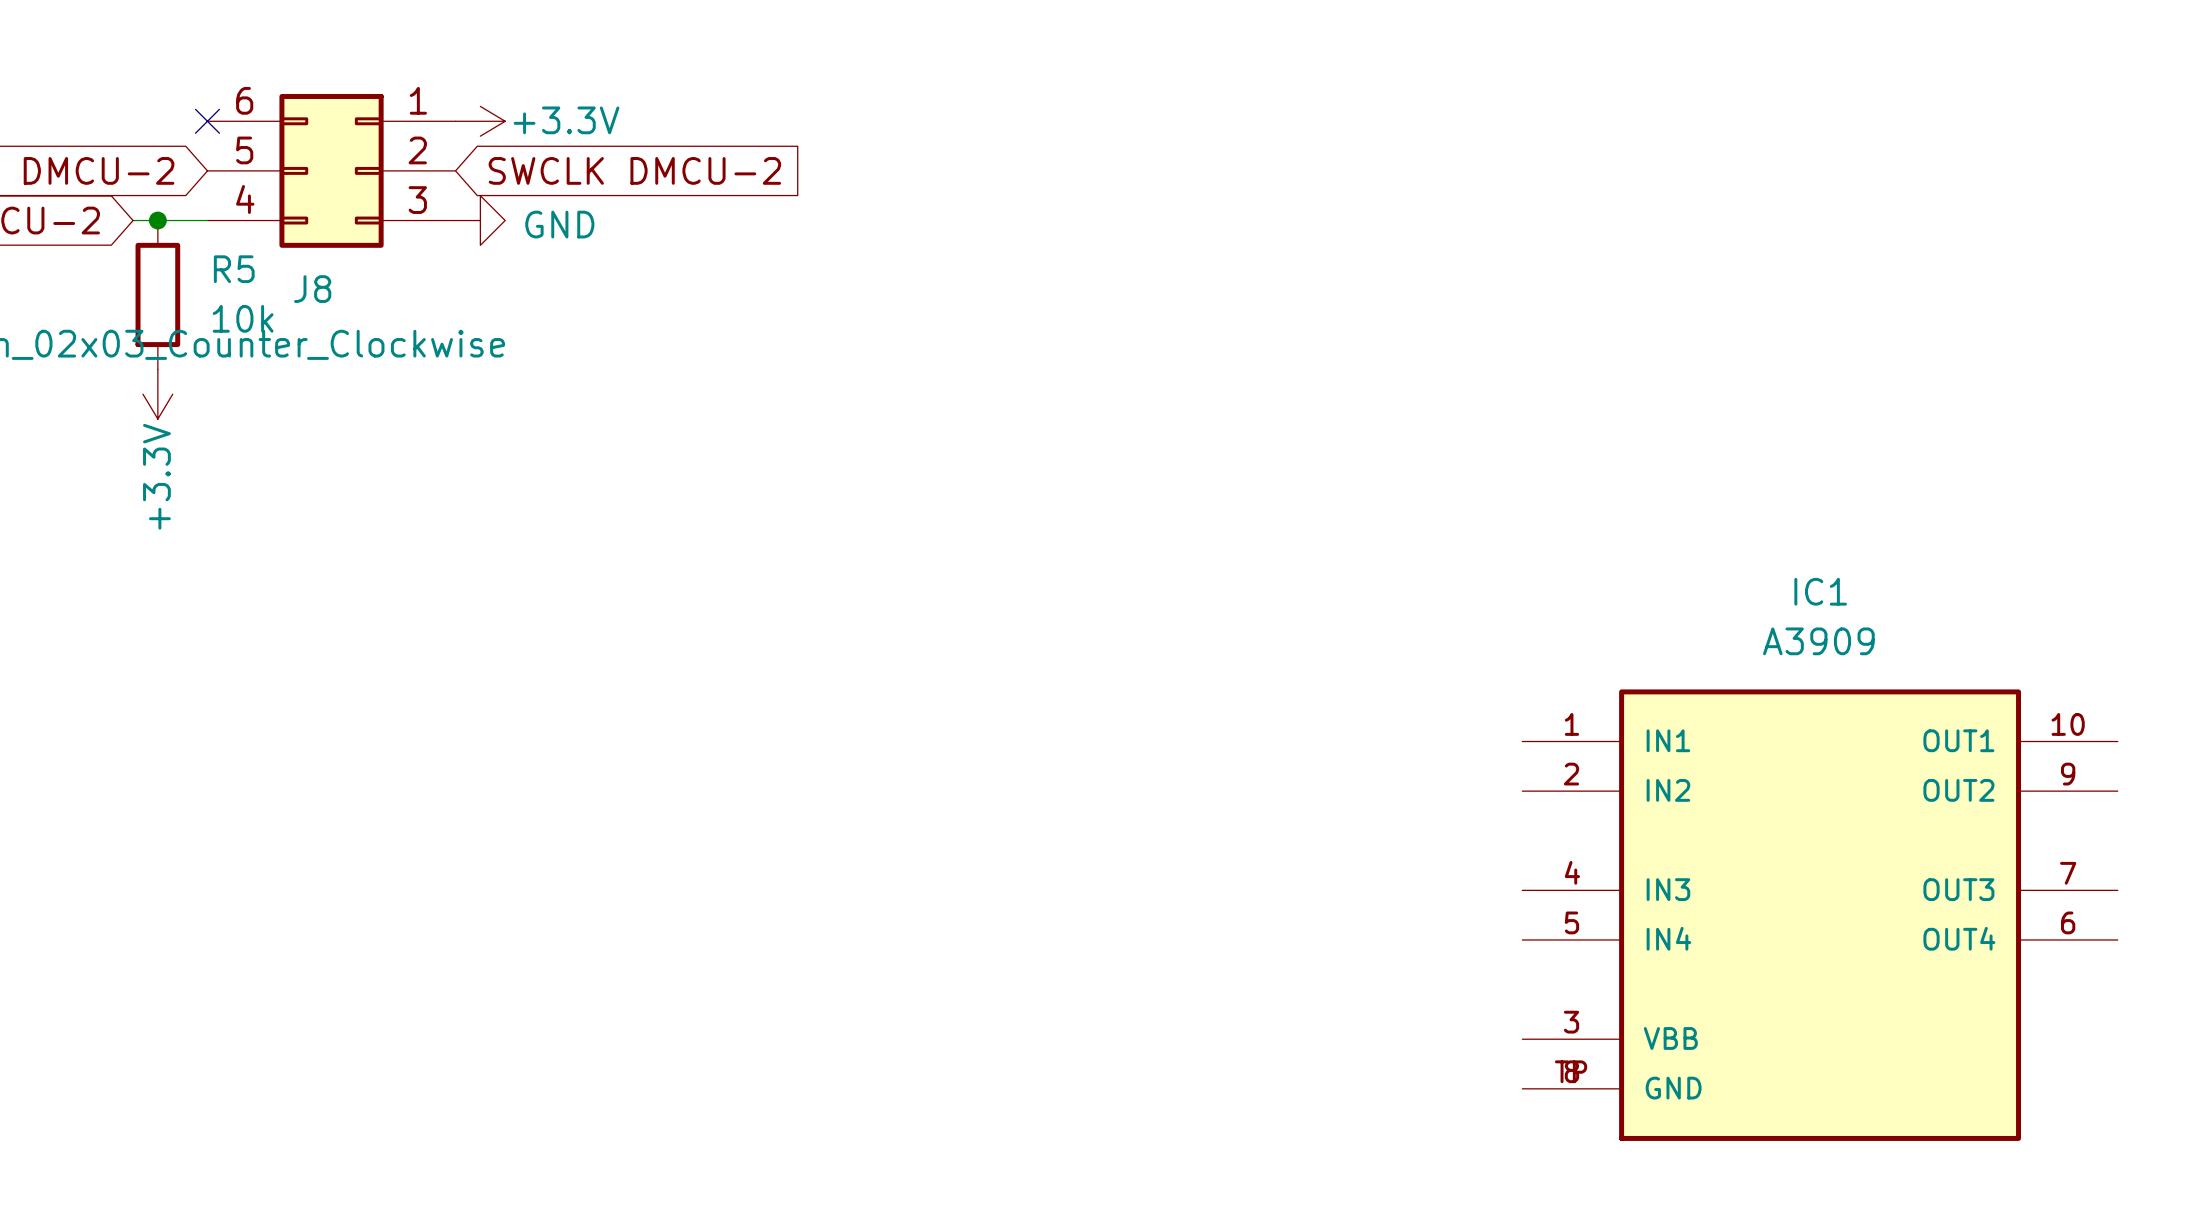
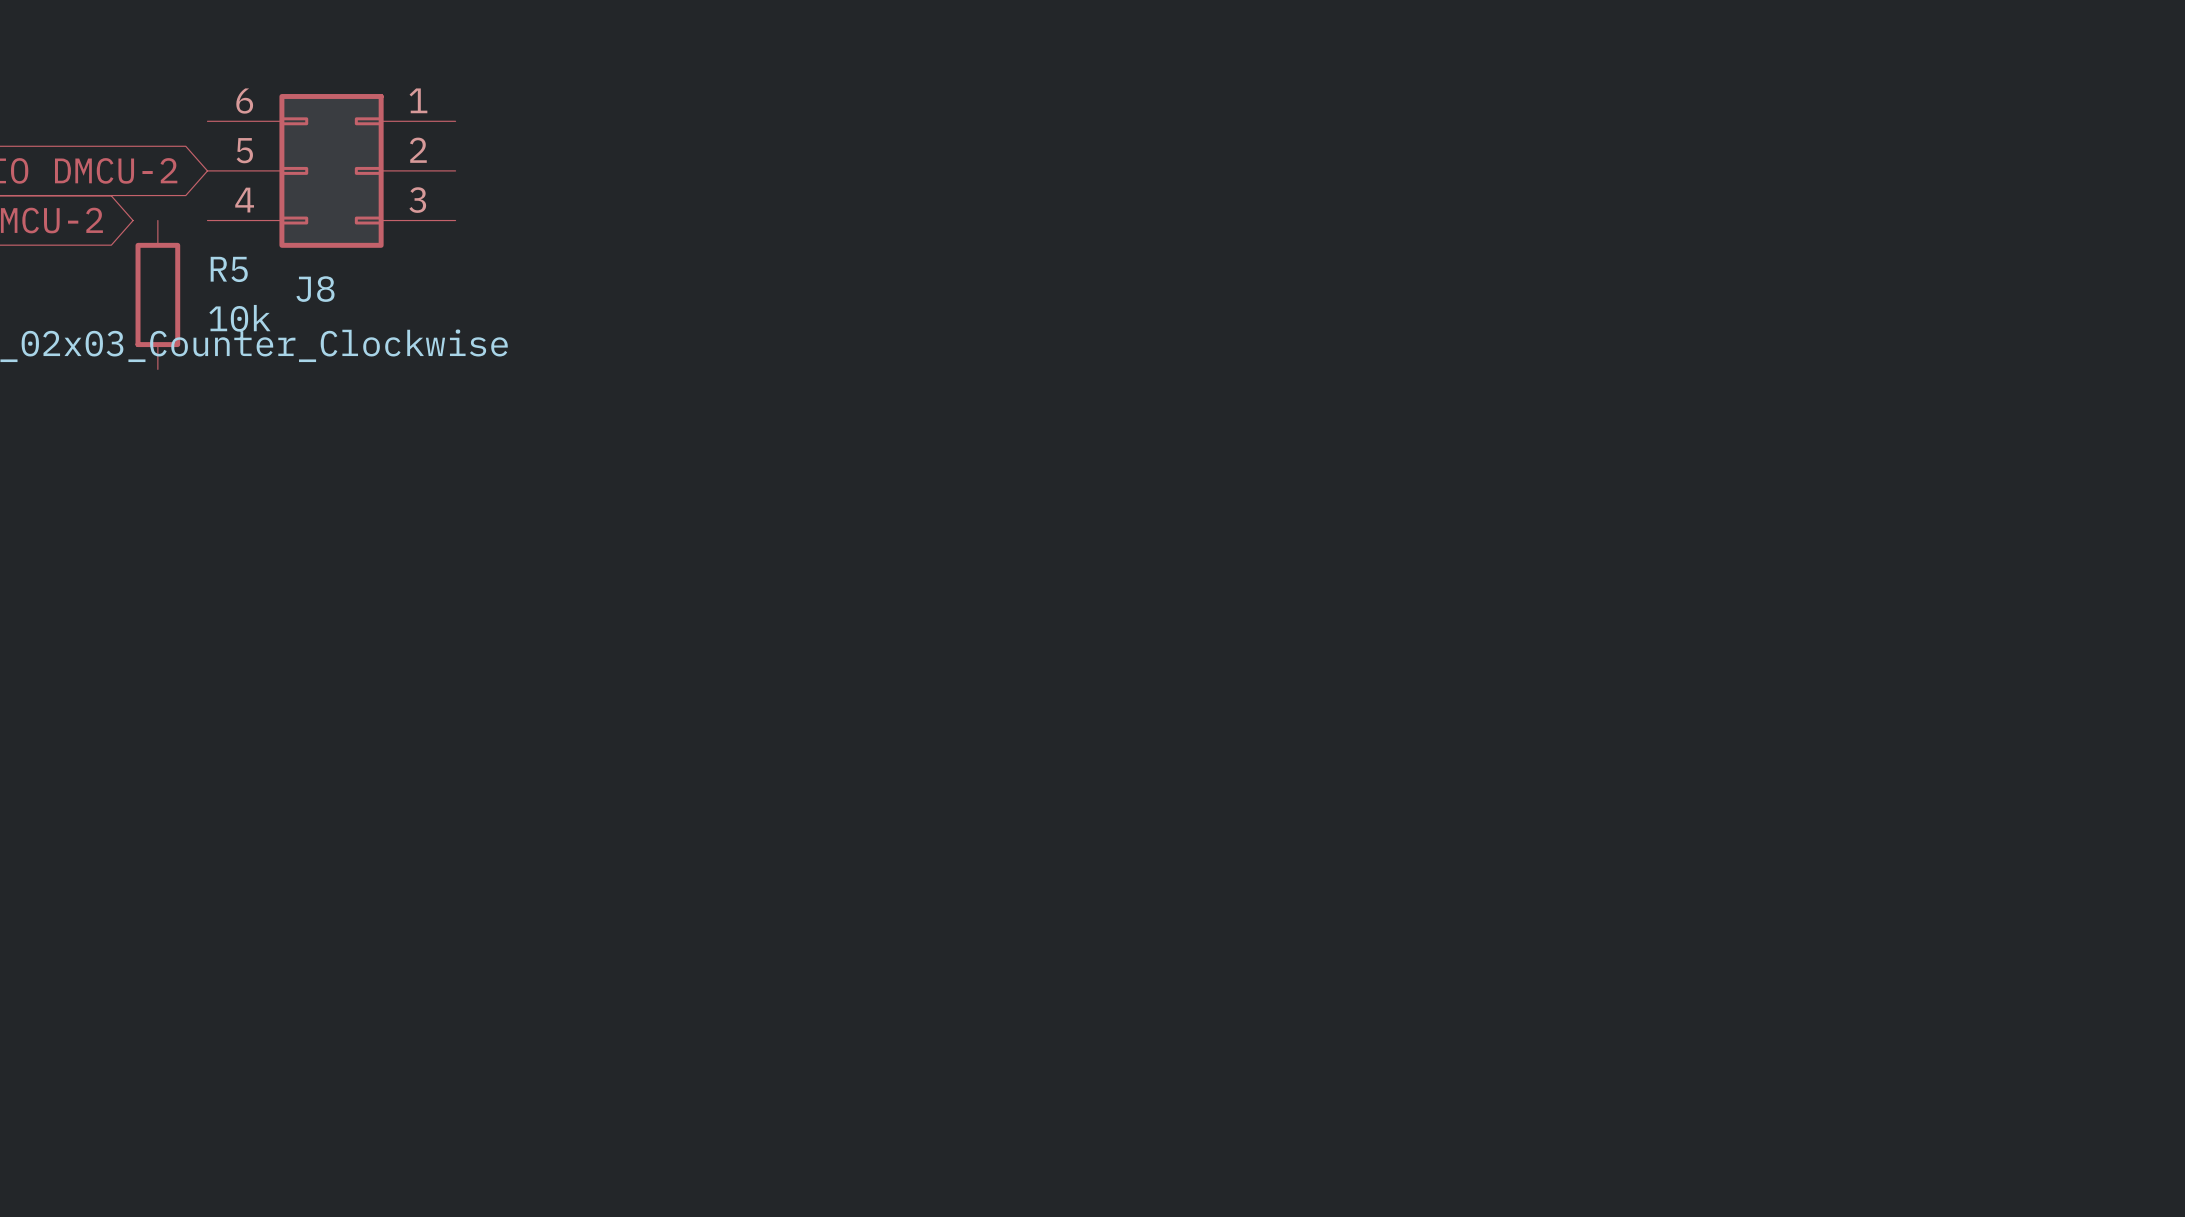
no-connect mark: (207, 121) -> none
power symbol: +3.3V (480, 121) -> none
global label: SWCLK DMCU-2 (634, 170) -> none
wire: (133, 220) (207, 220) -> none
junction: (157, 220) -> none
power symbol: GND (480, 220) -> none
power symbol: +3.3V (157, 394) -> none
IC1: A3909 (1820, 915) -> none

